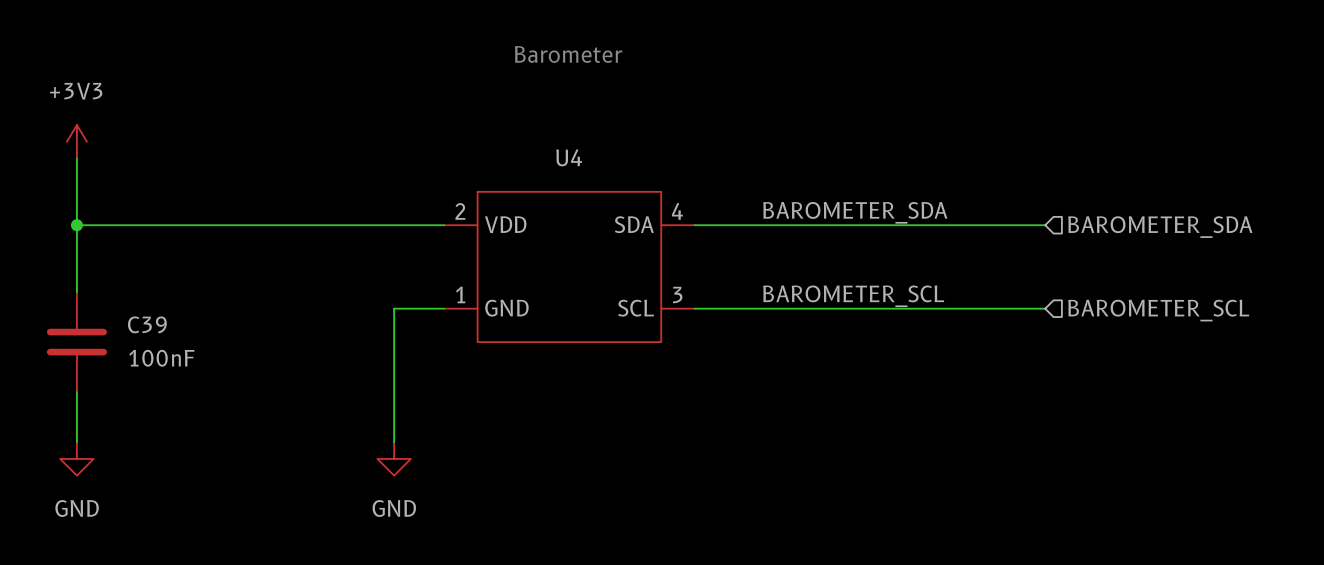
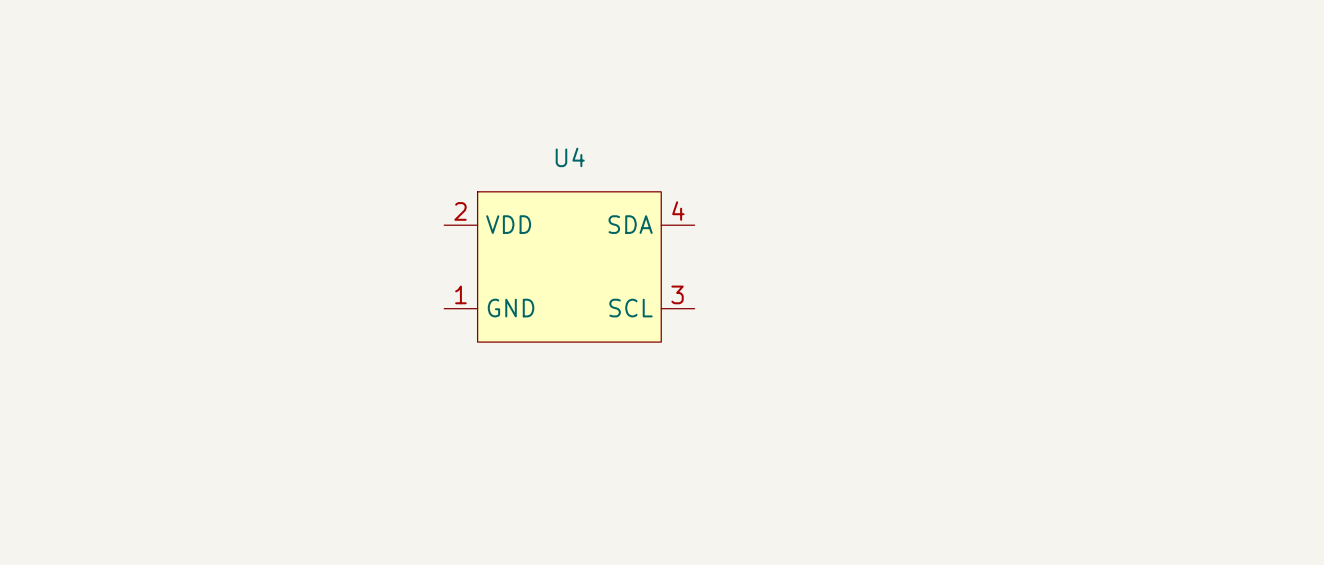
text: Barometer (568, 54) -> none
power symbol: +3V3 (76, 141) -> none
wire: (76, 158) (76, 291) -> none
label: BAROMETER_SDA (855, 212) -> none
wire: (76, 225) (444, 225) -> none
junction: (76, 225) -> none
wire: (694, 225) (1045, 225) -> none
hierarchical label: BAROMETER_SDA (1160, 227) -> none
label: BAROMETER_SCL (853, 296) -> none
wire: (444, 308) (394, 308) (394, 442) -> none
wire: (694, 308) (1045, 308) -> none
hierarchical label: BAROMETER_SCL (1158, 310) -> none
C39: 100nF (76, 342) -> none
wire: (76, 392) (76, 442) -> none
power symbol: GND (76, 458) -> none
power symbol: GND (394, 458) -> none

